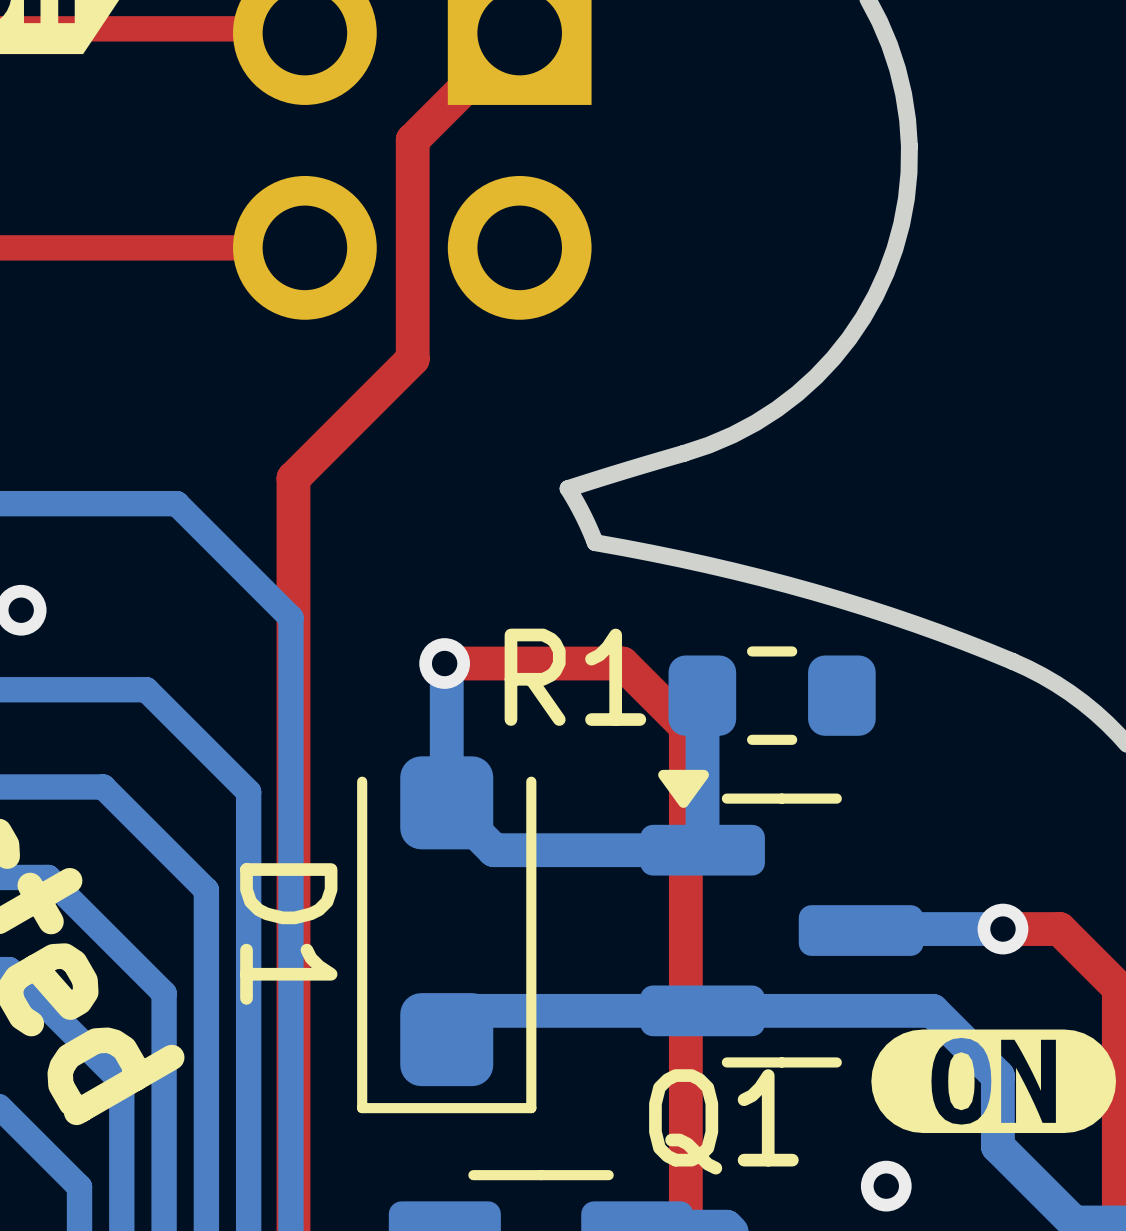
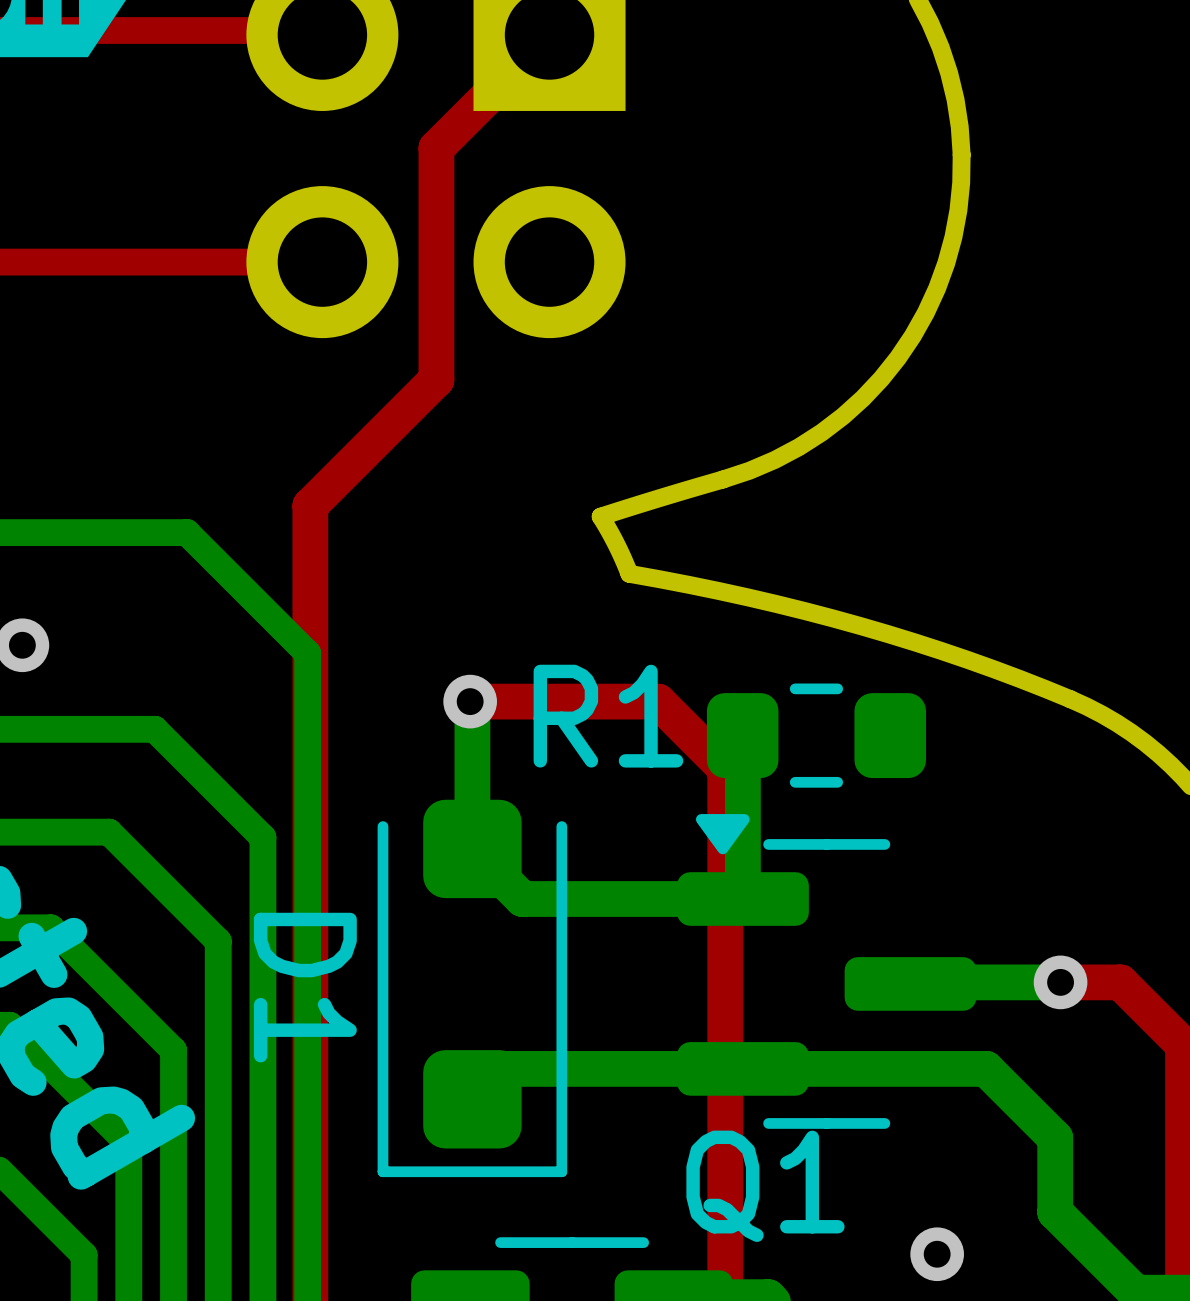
drawing: [871, 1029, 1117, 1134] -> none

